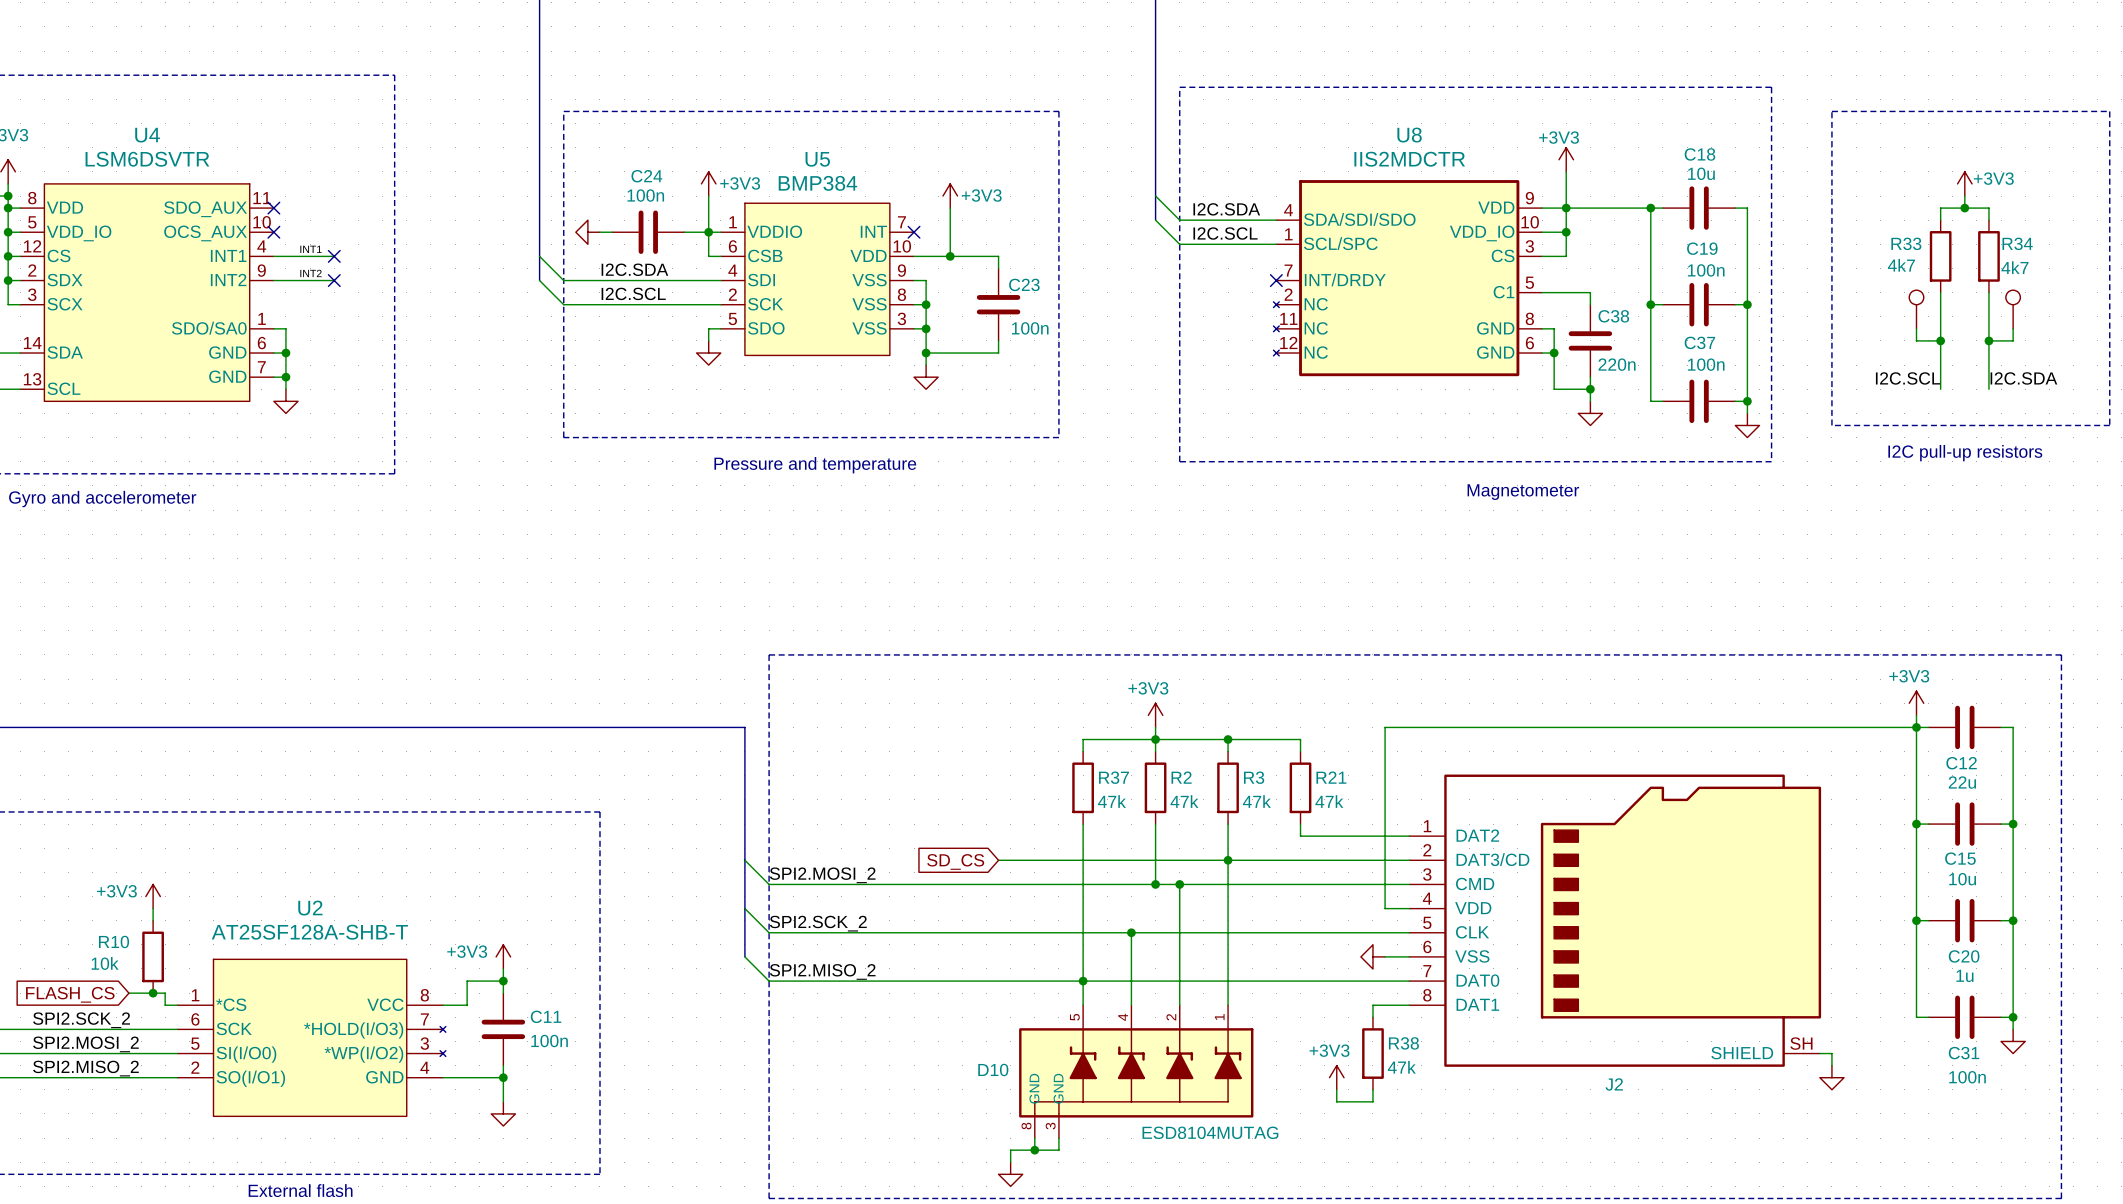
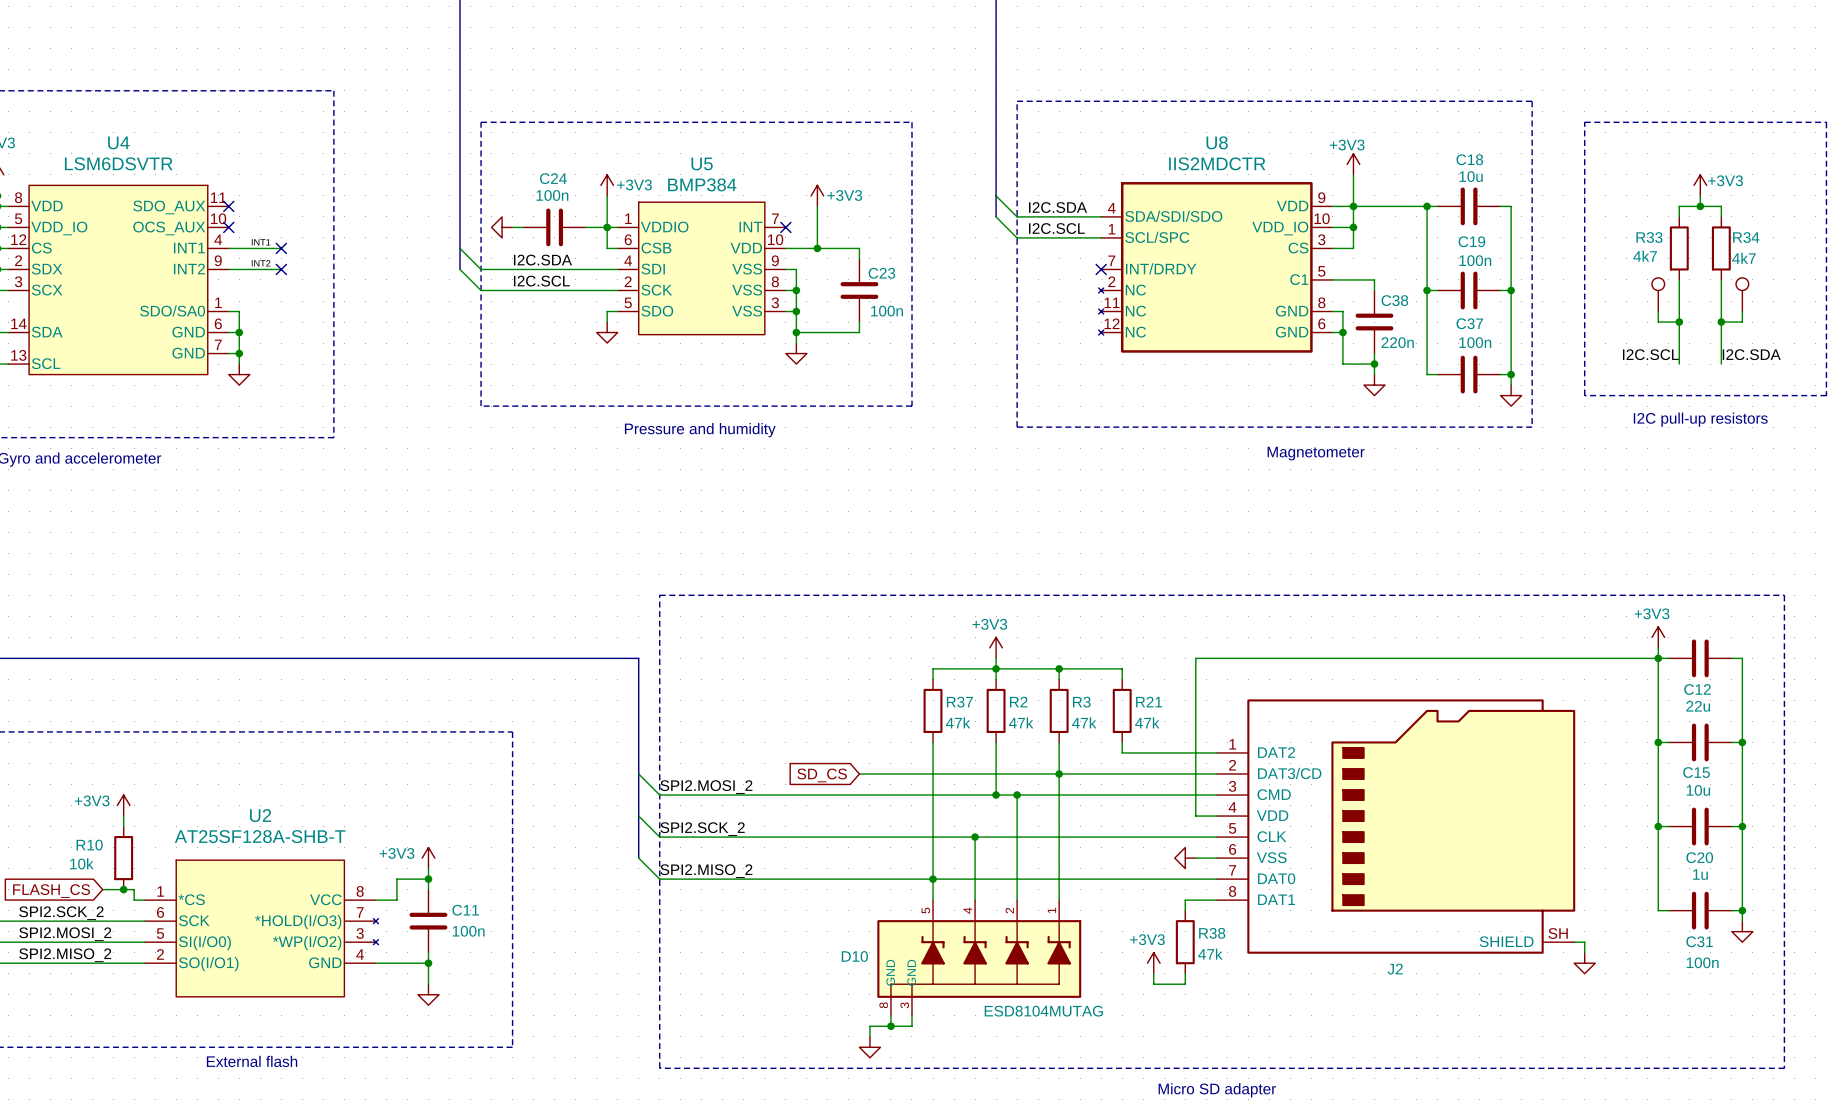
text: Pressure and temperature (815, 465) -> Pressure and humidity (700, 430)

